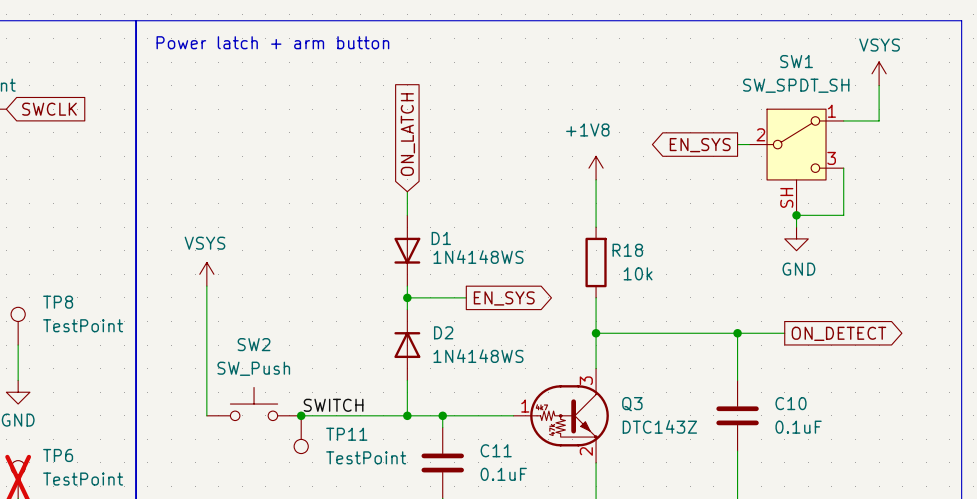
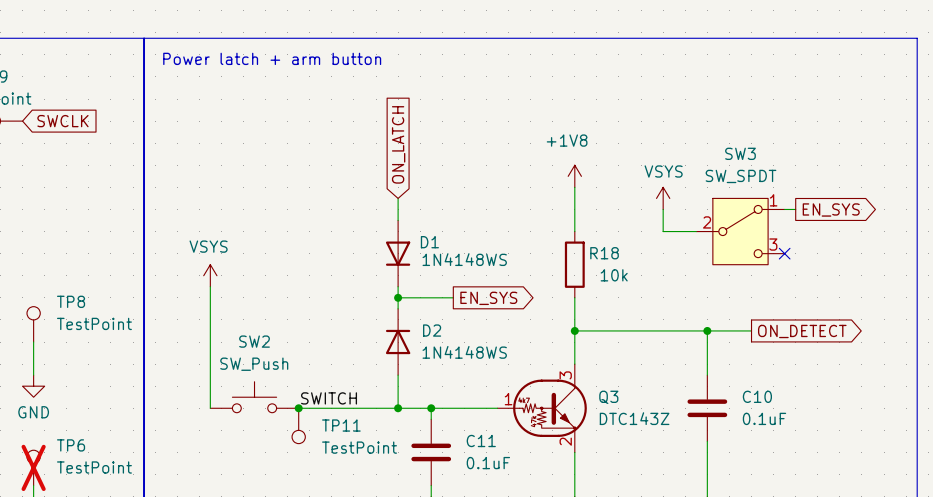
power symbol position: VSYS (879, 73) -> VSYS (663, 198)
wire: (879, 85) (879, 120) (843, 120) -> none
wire: (737, 144) (749, 144) -> (784, 209) (795, 209)
global label rotation: 0° (700, 145) -> 180° (831, 209)
global label position: EN_SYS (700, 145) -> EN_SYS (831, 209)
SW1: SW_SPDT_SH (796, 162) -> none
wire: (843, 168) (843, 215) (796, 215) (796, 227) -> none
wire: none -> (663, 209) (663, 231) (696, 231)
junction: (796, 215) -> none
SW3: none -> SW_SPDT (740, 231)
power symbol: GND (796, 238) -> none
no-connect mark: none -> (784, 253)

